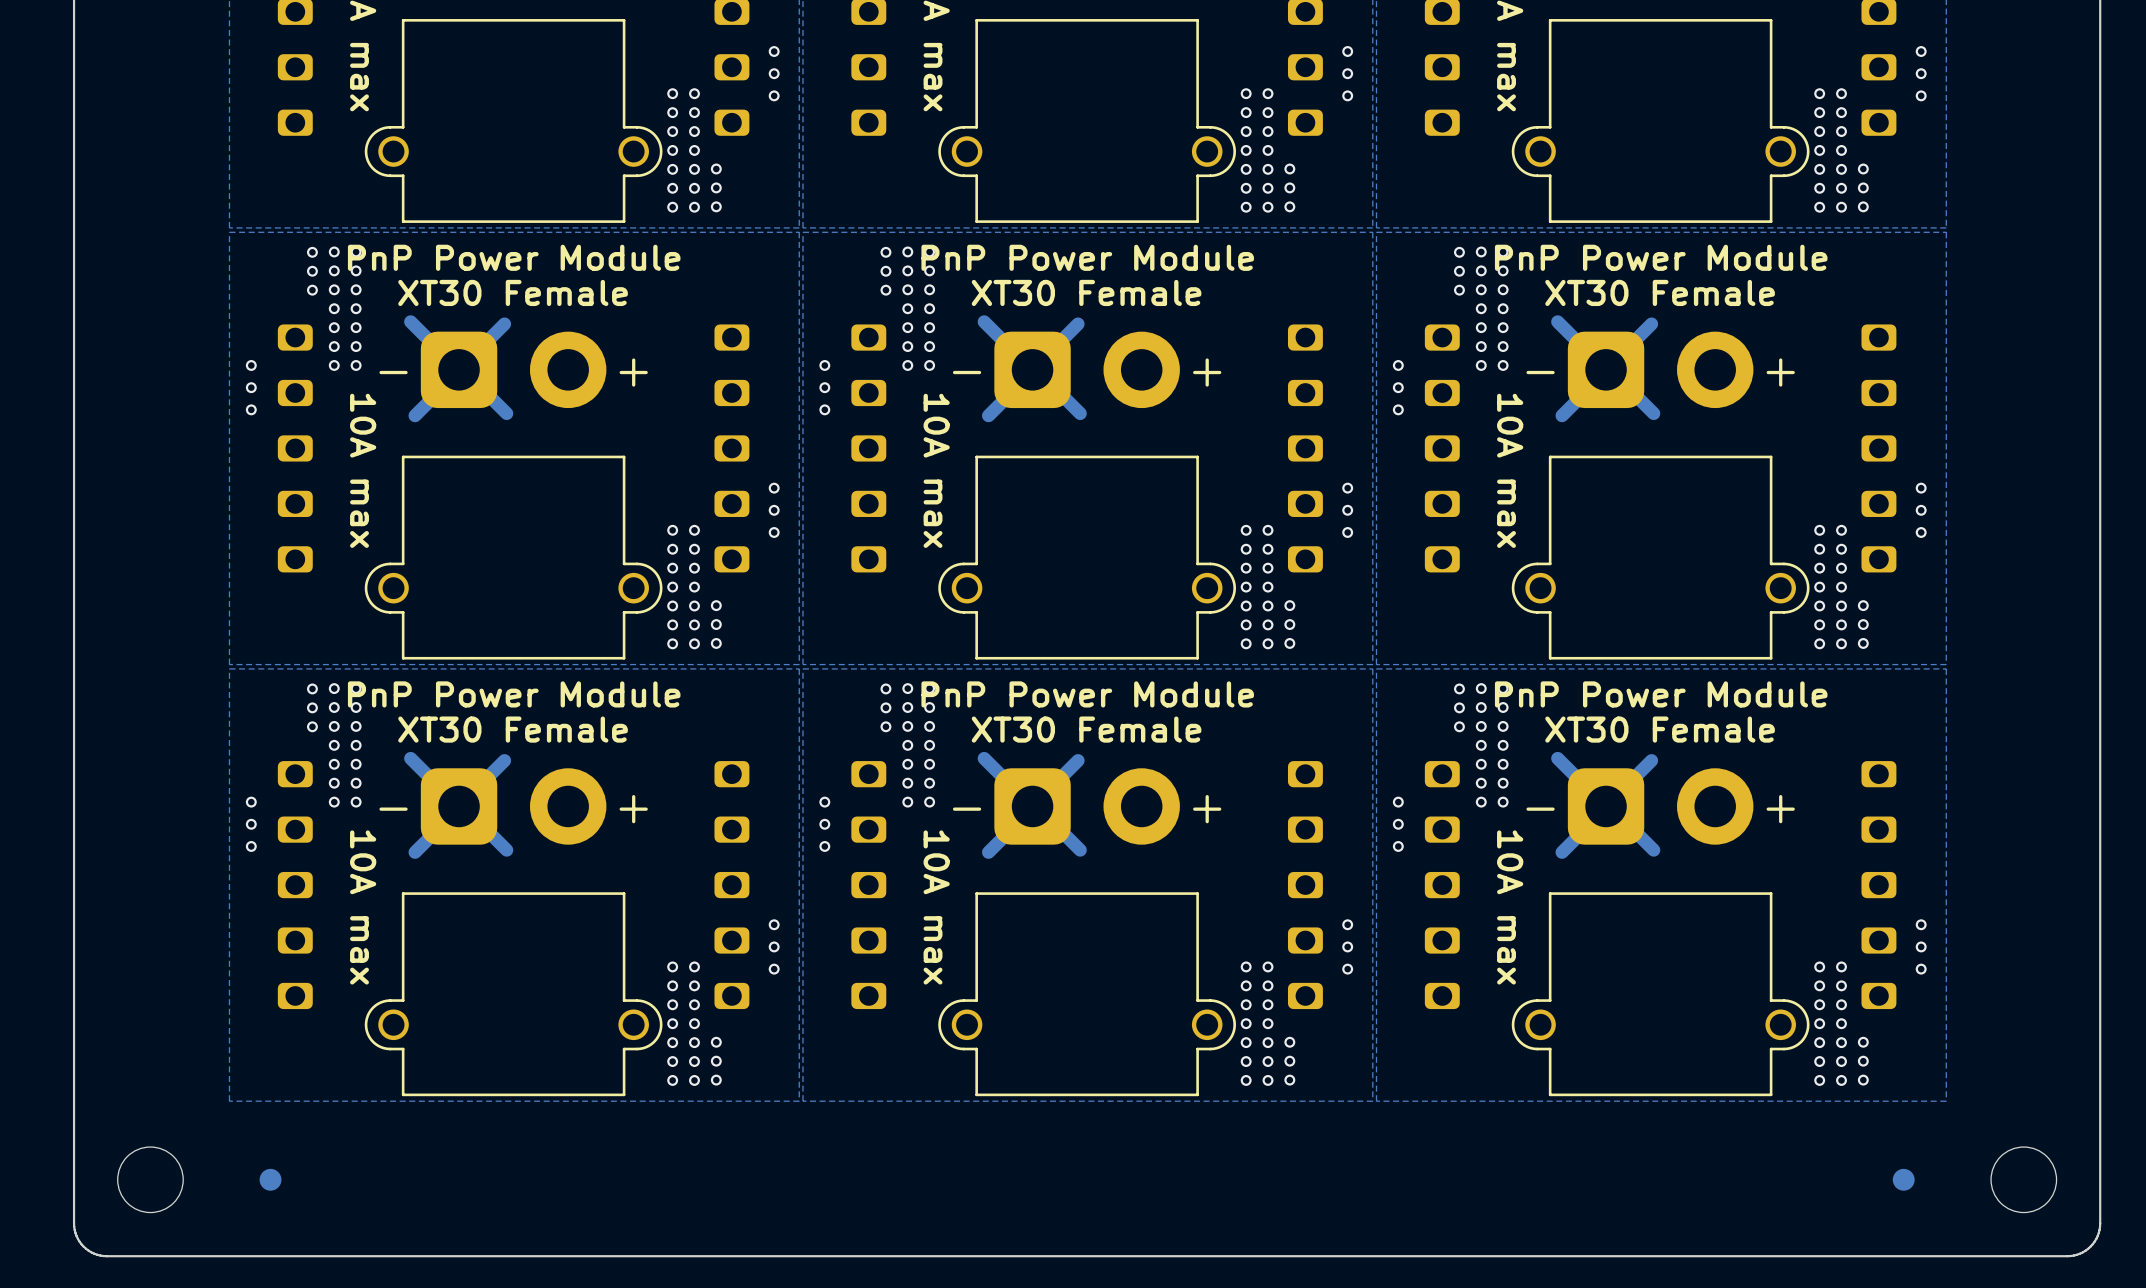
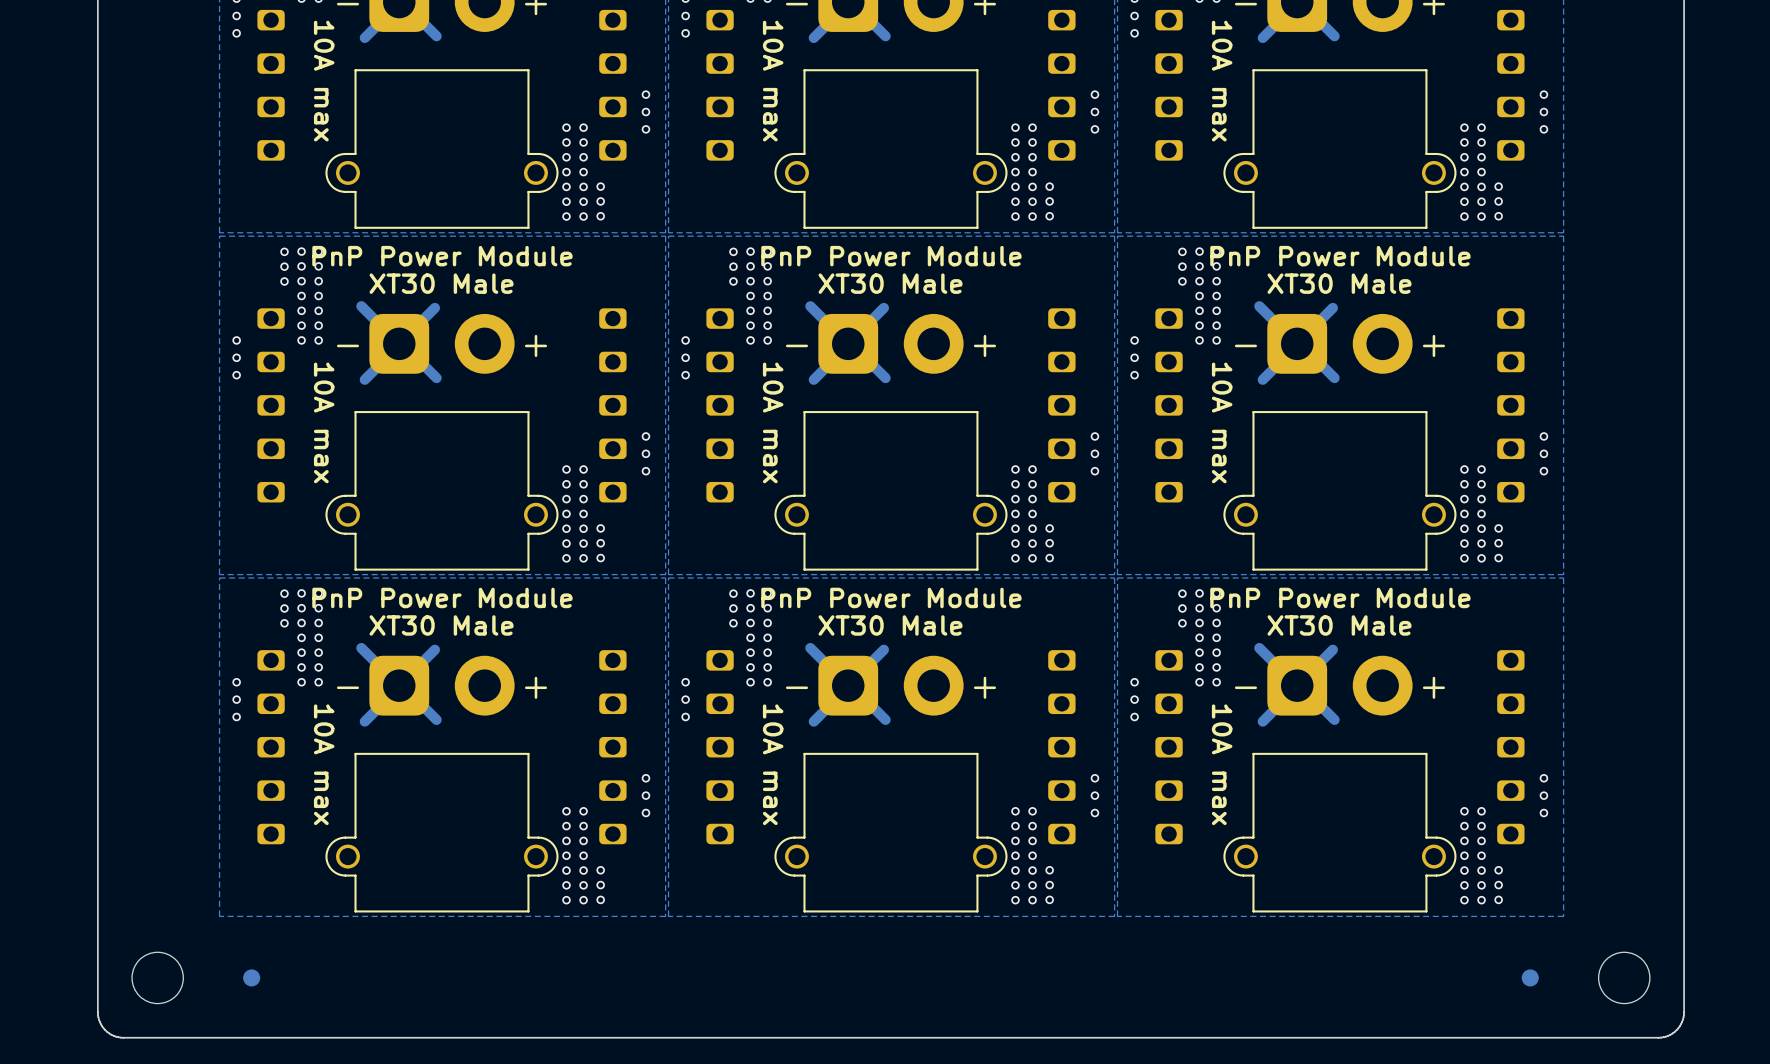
text: XT30 Female (513, 292) -> XT30 Male (441, 283)
text: XT30 Female (1086, 292) -> XT30 Male (890, 283)
text: XT30 Female (1660, 292) -> XT30 Male (1339, 283)
text: XT30 Female (513, 729) -> XT30 Male (441, 625)
text: XT30 Female (1086, 729) -> XT30 Male (890, 625)
text: XT30 Female (1660, 729) -> XT30 Male (1339, 625)

